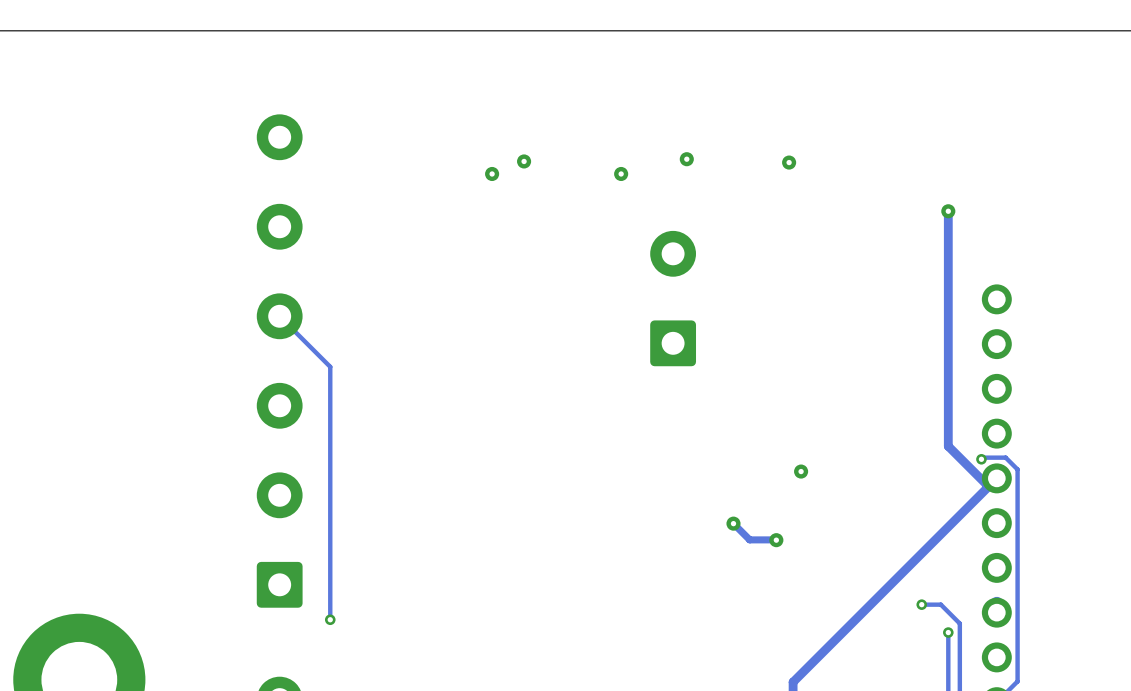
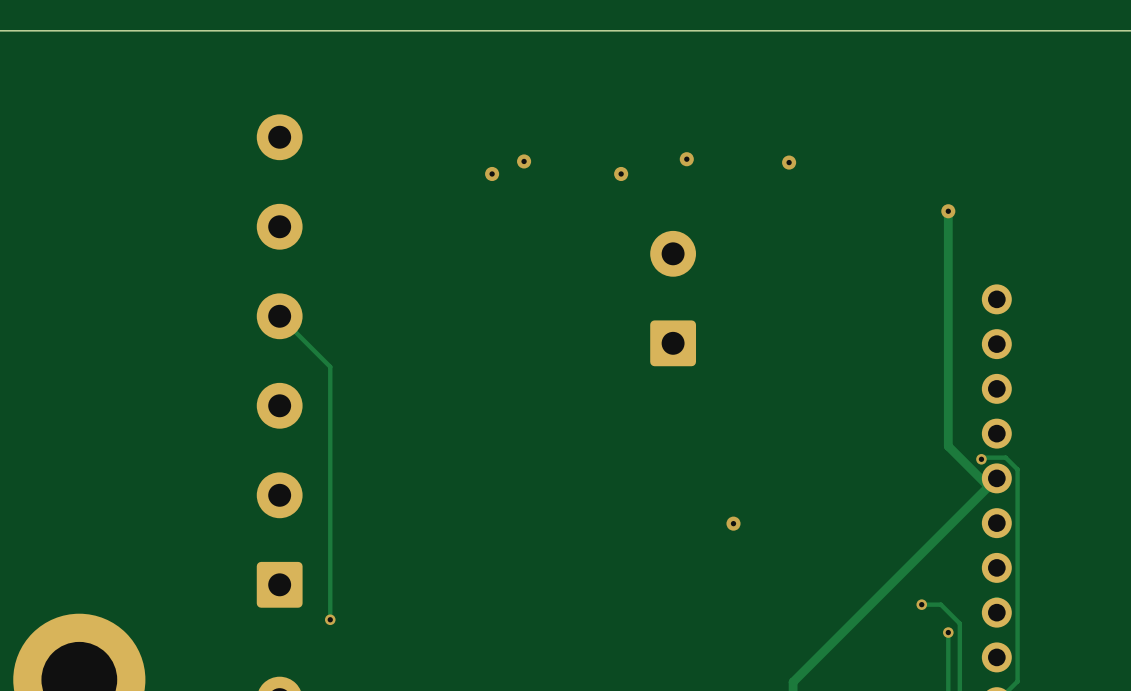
via: (801, 471) -> none
track: (733, 523) (749, 539) (776, 540) -> none
via: (776, 540) -> none

